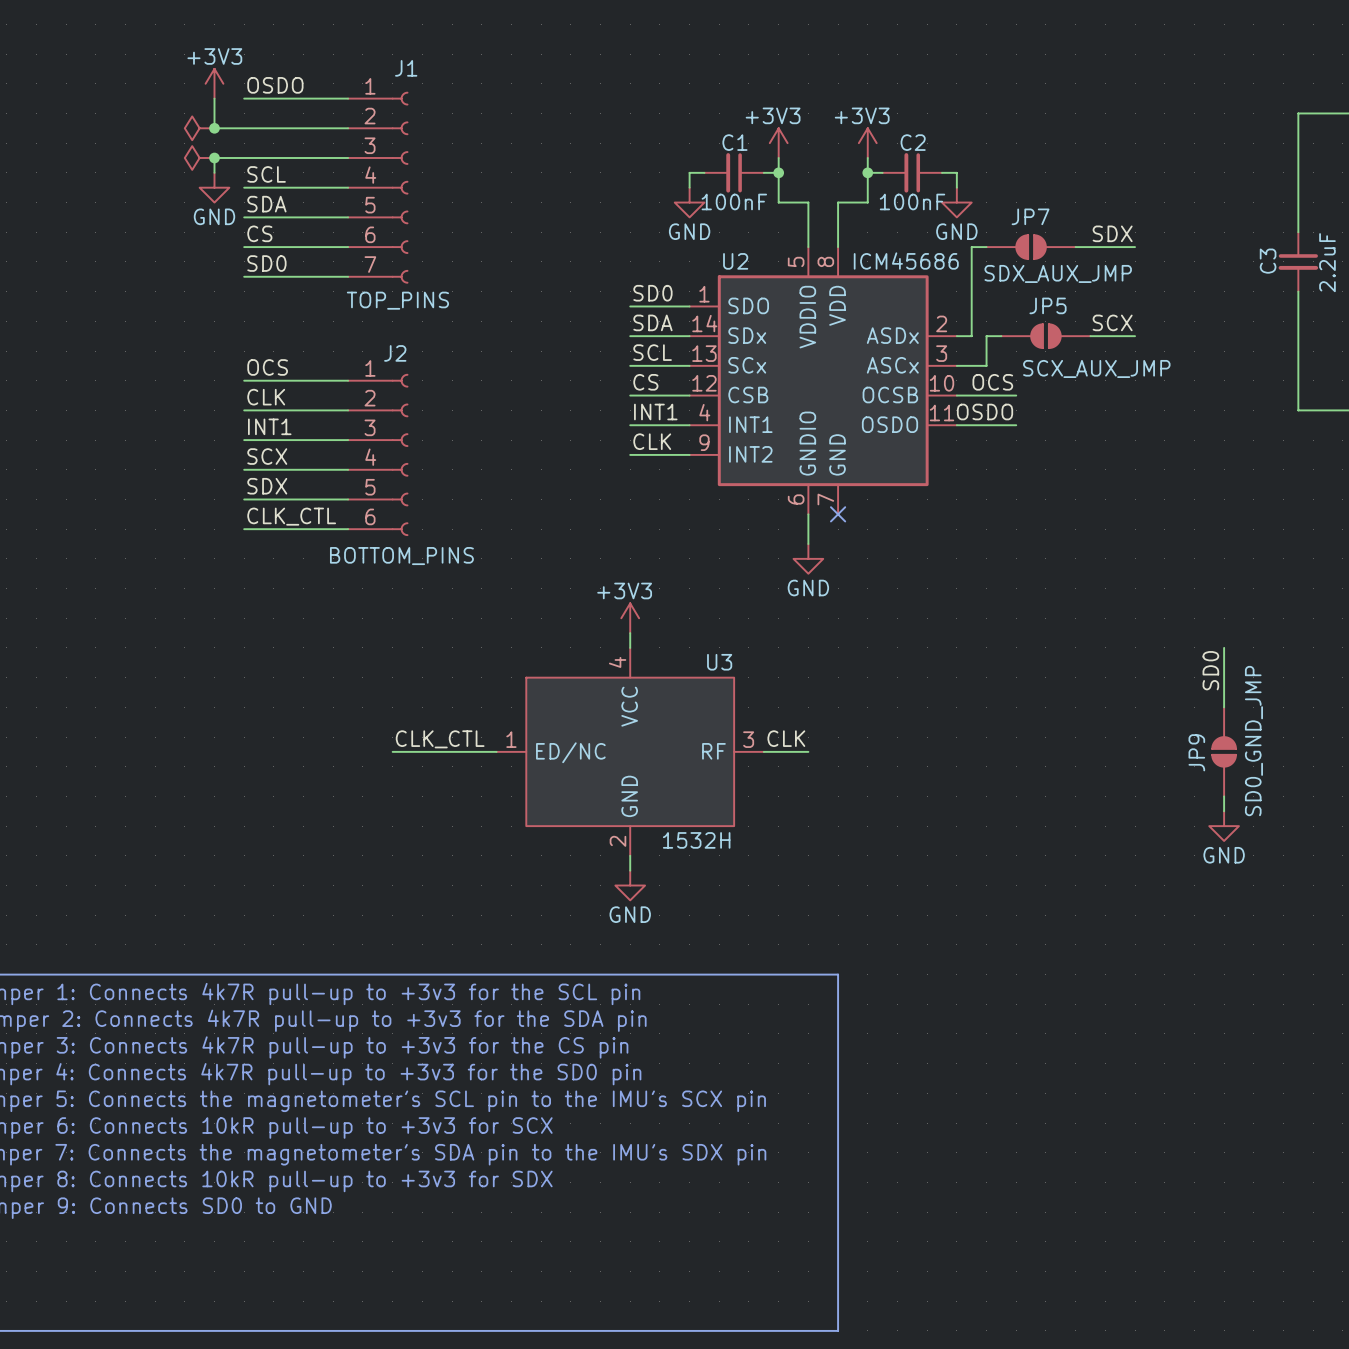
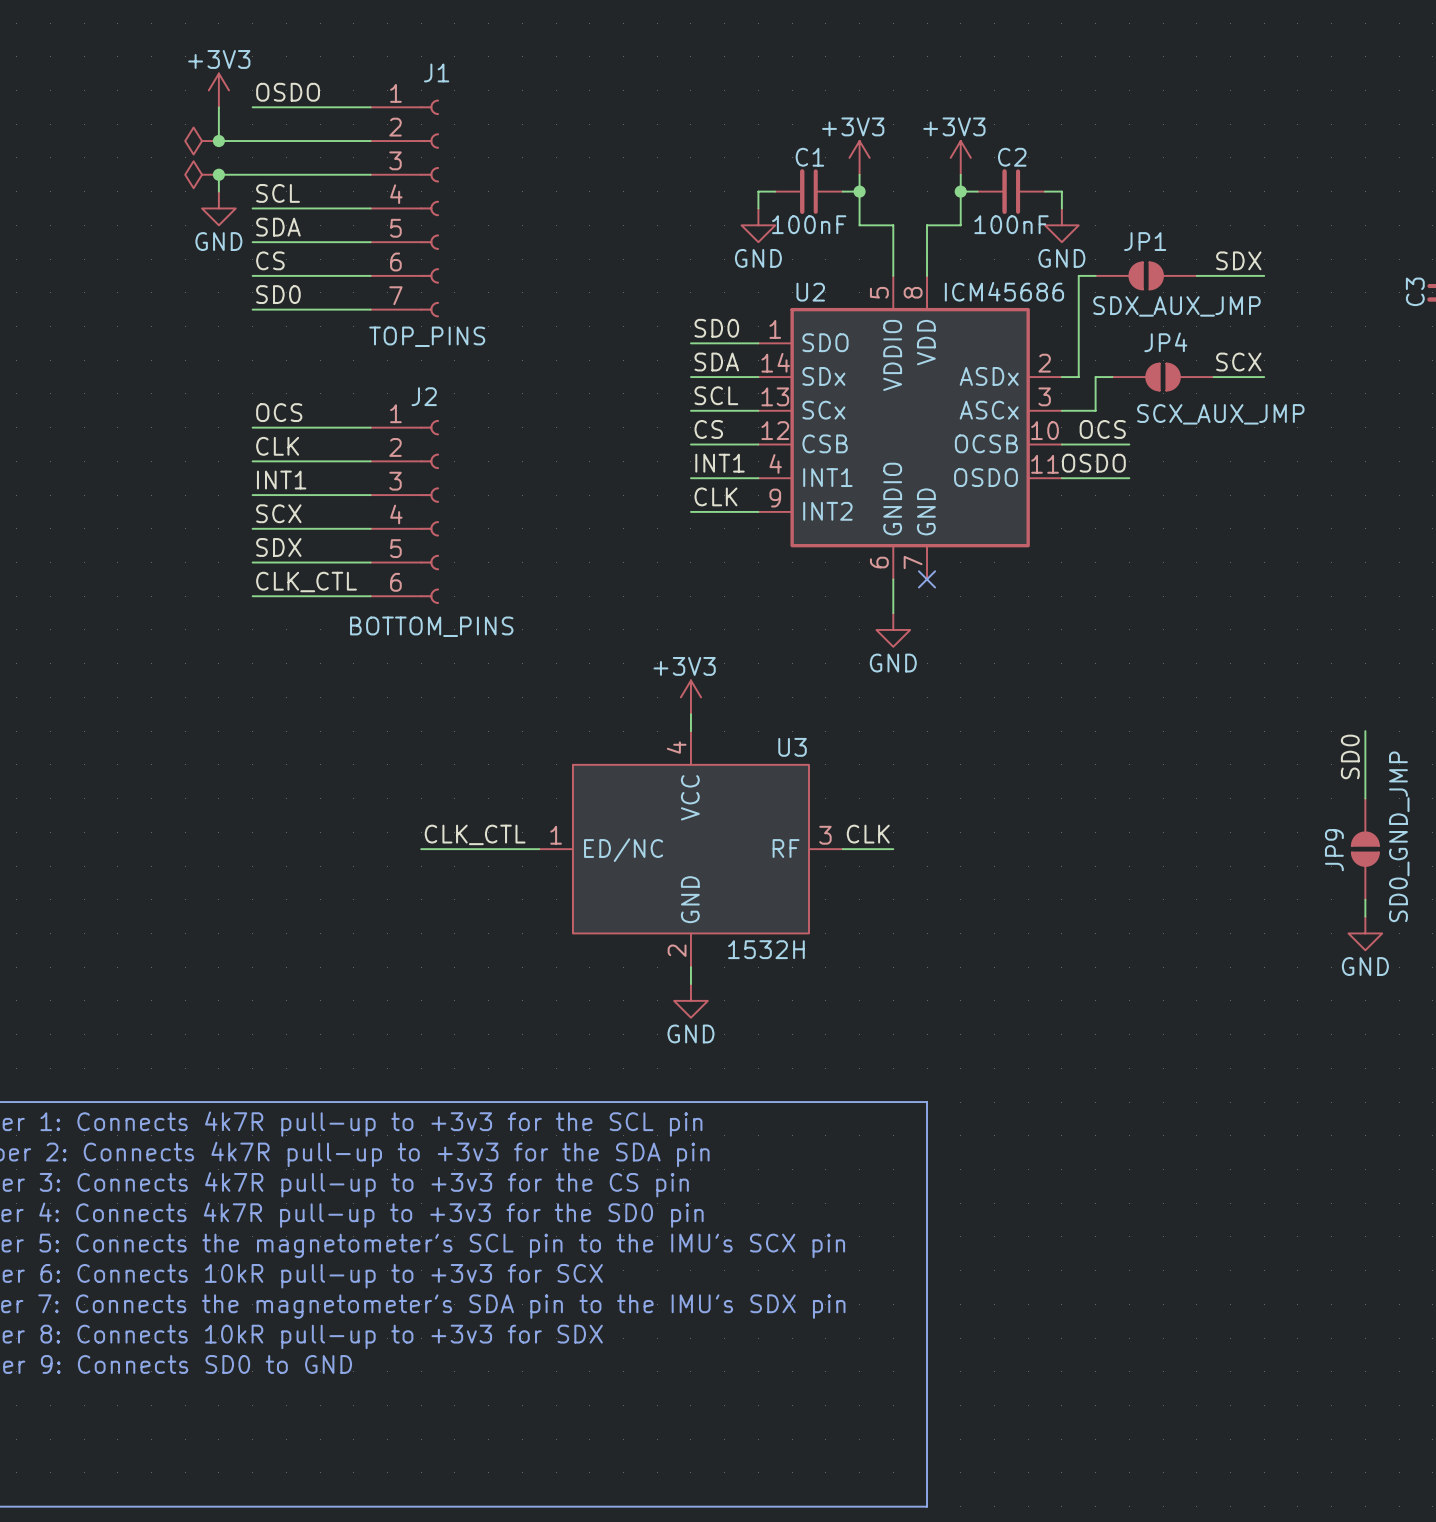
JP7 name: JP7 (1030, 216) -> JP1 (1145, 241)
JP5 name: JP5 (1048, 305) -> JP4 (1165, 342)

